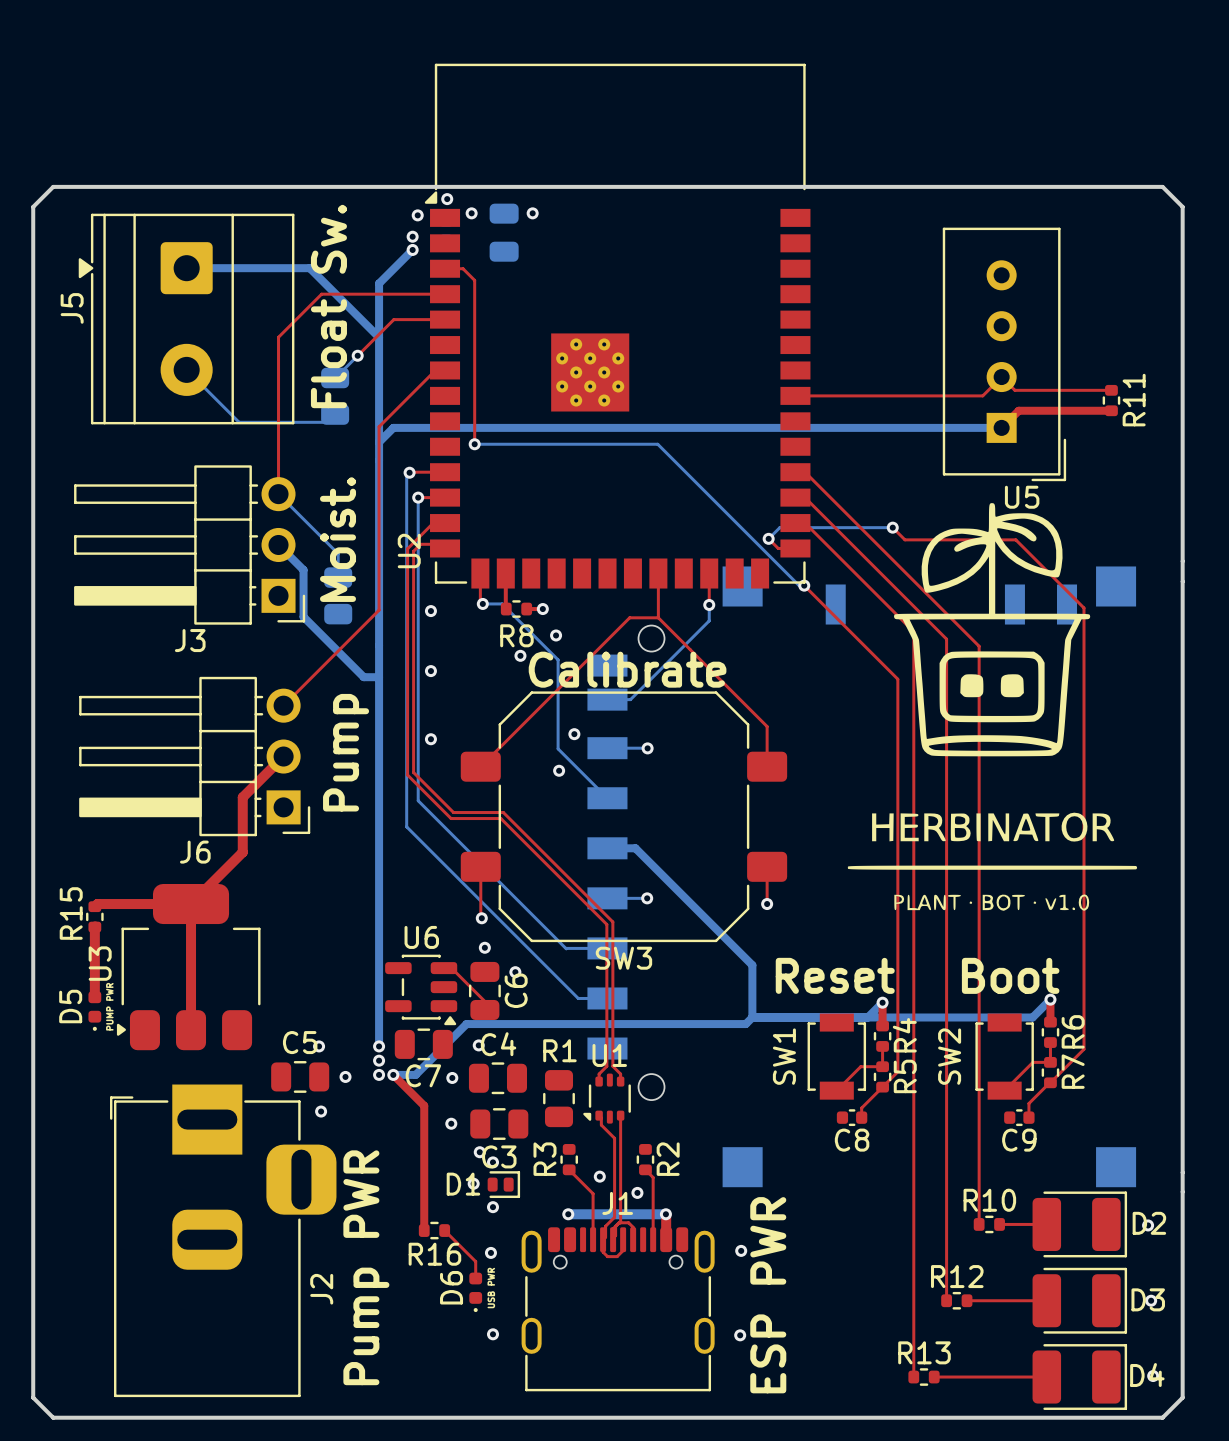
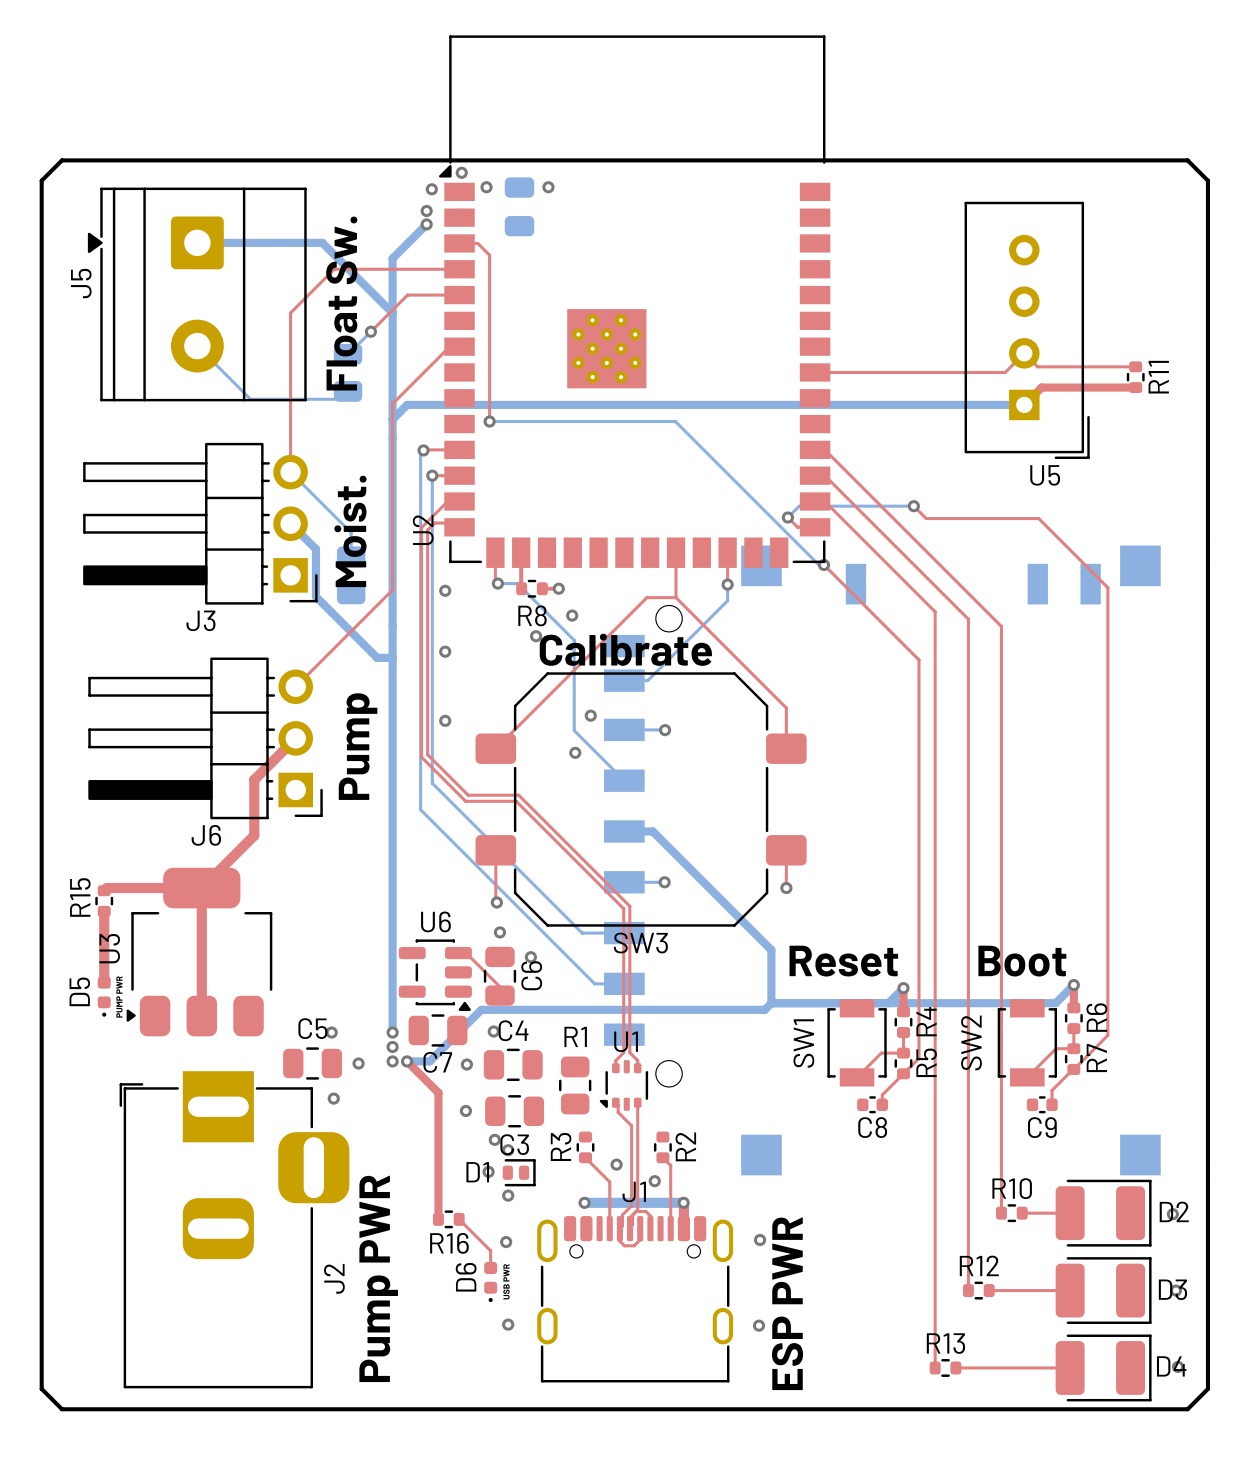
drawing: [847, 503, 1138, 911] -> none

